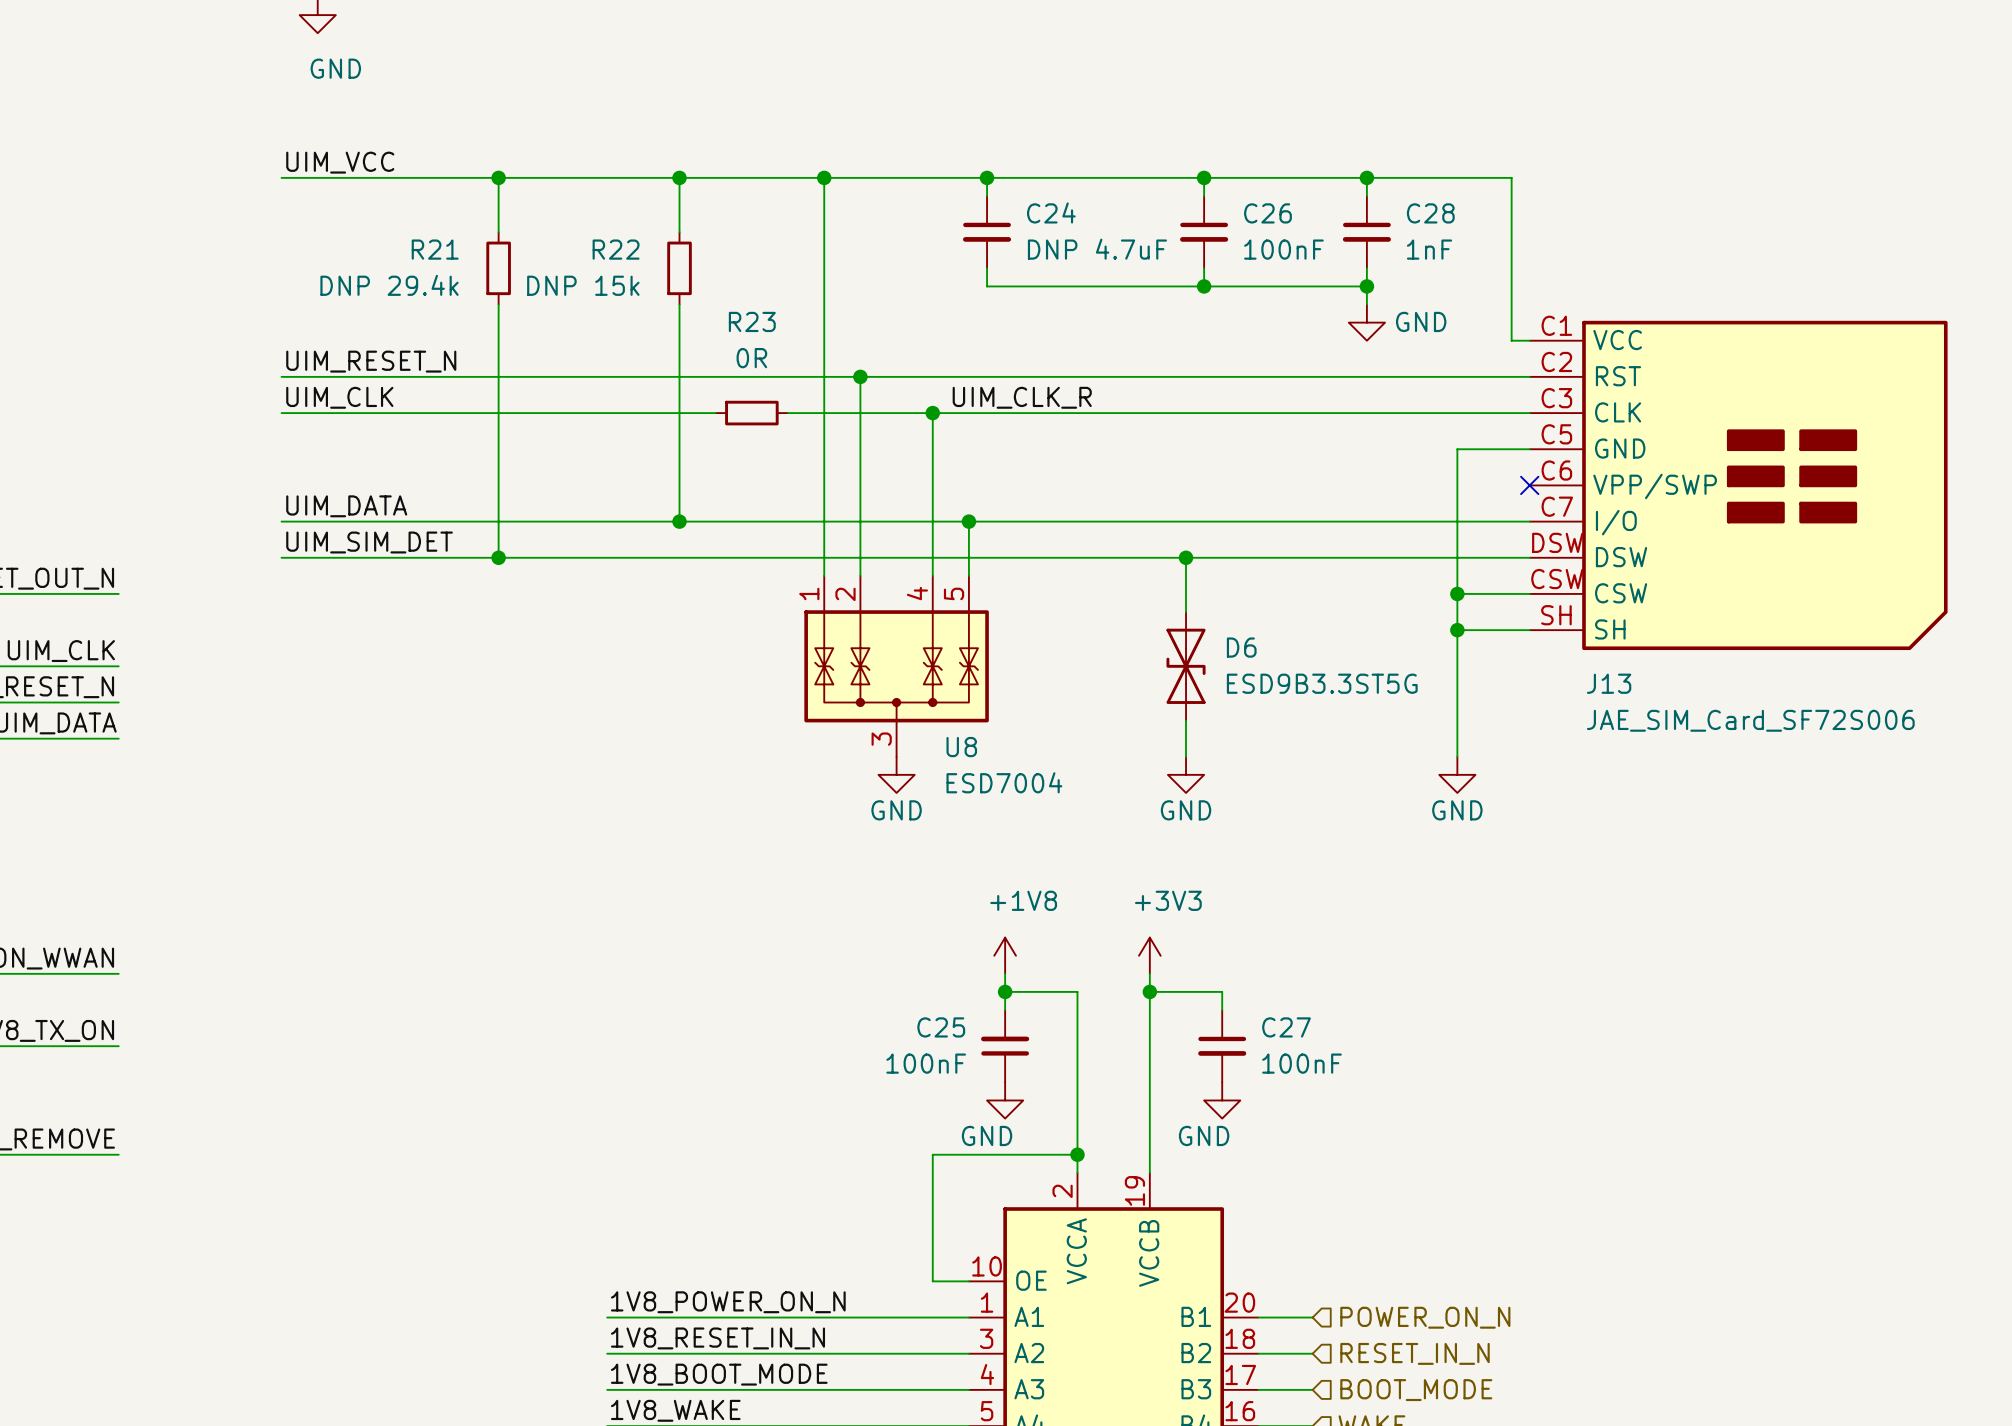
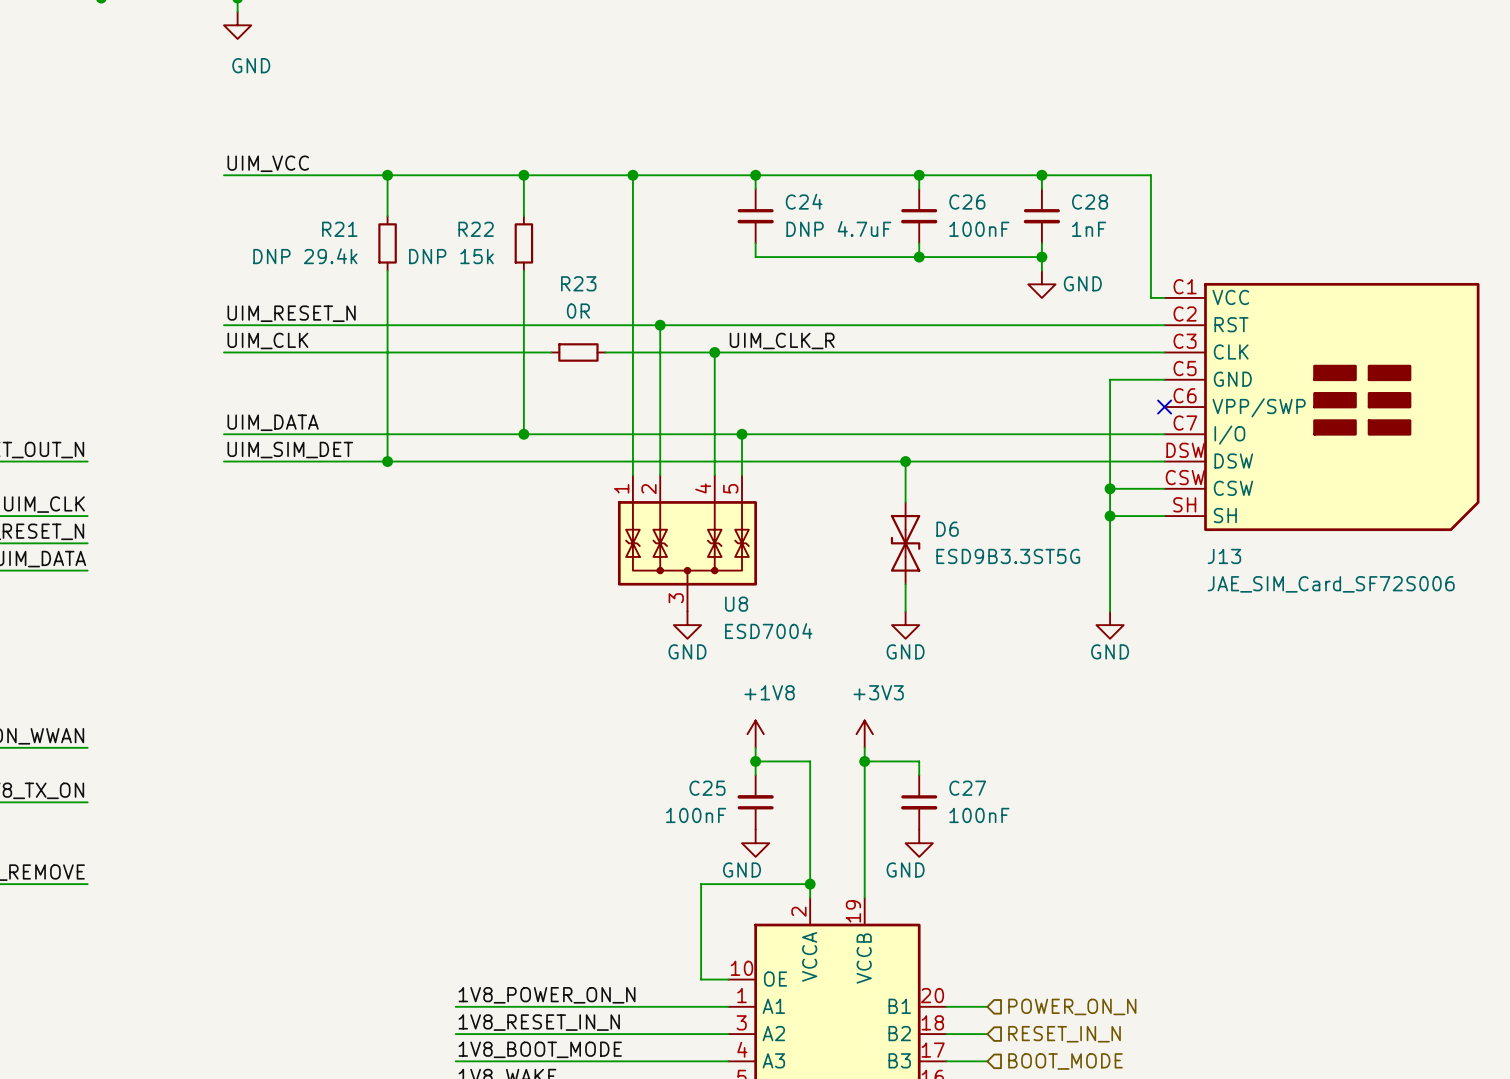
label position: UIM_VCC (340, 162) -> UIM_VCC (268, 163)
wire: (281, 177) (1511, 177) (1511, 340) (1529, 340) -> (223, 175) (1150, 175) (1150, 297) (1164, 297)
wire: (498, 177) (498, 232) -> (387, 175) (387, 216)
junction position: (498, 177) -> (387, 175)
wire: (679, 177) (679, 232) -> (523, 175) (523, 216)
junction position: (679, 177) -> (523, 175)
wire: (824, 177) (824, 575) -> (632, 175) (632, 475)
junction position: (824, 177) -> (632, 175)
wire: (987, 177) (987, 195) -> (755, 175) (755, 188)
junction position: (987, 177) -> (755, 175)
wire: (1204, 177) (1204, 195) -> (919, 175) (919, 188)
junction: (1204, 177) -> none
wire: (1366, 177) (1366, 195) -> (1041, 175) (1041, 188)
junction: (1366, 177) -> none
junction: none -> (919, 175)
junction: none -> (1041, 175)
C24 position: (987, 232) -> (755, 216)
C26 position: (1204, 232) -> (919, 216)
C28 position: (1366, 232) -> (1041, 216)
R21 position: (498, 268) -> (387, 243)
R22 position: (679, 268) -> (523, 243)
wire: (987, 268) (987, 286) (1366, 286) -> (755, 243) (755, 257) (1041, 257)
wire: (1204, 268) (1204, 286) -> (919, 243) (919, 257)
wire: (1366, 268) (1366, 304) -> (1041, 243) (1041, 270)
junction: (1204, 286) -> none
junction: (1366, 286) -> none
wire: (498, 304) (498, 557) -> (387, 270) (387, 461)
wire: (679, 304) (679, 521) -> (523, 270) (523, 434)
junction: none -> (919, 257)
power symbol position: GND (1366, 322) -> GND (1041, 284)
junction: none -> (1041, 257)
label position: UIM_RESET_N (371, 361) -> UIM_RESET_N (291, 313)
wire: (281, 376) (1529, 376) -> none
wire: (860, 376) (860, 575) -> (660, 325) (660, 475)
junction: (860, 376) -> none
label position: UIM_CLK (339, 397) -> UIM_CLK (267, 340)
label position: UIM_CLK_R (1022, 397) -> UIM_CLK_R (782, 340)
wire: (281, 413) (299, 413) -> none
wire: none -> (537, 325) (592, 325)
R23 position: (751, 413) -> (578, 352)
junction: none -> (660, 325)
wire: (932, 413) (932, 575) -> (714, 352) (714, 475)
junction: (932, 413) -> none
wire: none -> (223, 352) (551, 352)
junction: none -> (714, 352)
wire: (1457, 449) (1457, 756) -> (1096, 352) (605, 352)
no-connect mark position: (1529, 485) -> (1164, 407)
wire: none -> (1164, 379) (1110, 379) (1110, 611)
J13 position: (1738, 485) -> (1322, 407)
label position: UIM_DATA (346, 506) -> UIM_DATA (273, 422)
wire: (281, 521) (1529, 521) -> none
junction position: (679, 521) -> (523, 434)
wire: (968, 521) (968, 575) -> (742, 434) (742, 475)
junction: (968, 521) -> none
label position: UIM_SIM_DET (369, 542) -> UIM_SIM_DET (290, 450)
wire: (281, 557) (299, 557) -> none
junction position: (498, 557) -> (387, 461)
junction: none -> (742, 434)
wire: (1186, 557) (1186, 612) -> (905, 461) (905, 502)
junction position: (1186, 557) -> (905, 461)
wire: none -> (223, 461) (1096, 461)
junction: (1457, 593) -> none
junction position: (1457, 630) -> (1110, 488)
U8 position: (896, 666) -> (687, 543)
D6 position: (1186, 666) -> (905, 543)
wire: none -> (1110, 516) (1164, 516)
junction: none -> (1110, 516)
wire: (1186, 720) (1186, 756) -> (905, 584) (905, 611)
power symbol position: GND (896, 774) -> GND (687, 625)
power symbol position: GND (1186, 774) -> GND (905, 625)
power symbol position: GND (1457, 774) -> GND (1110, 625)

